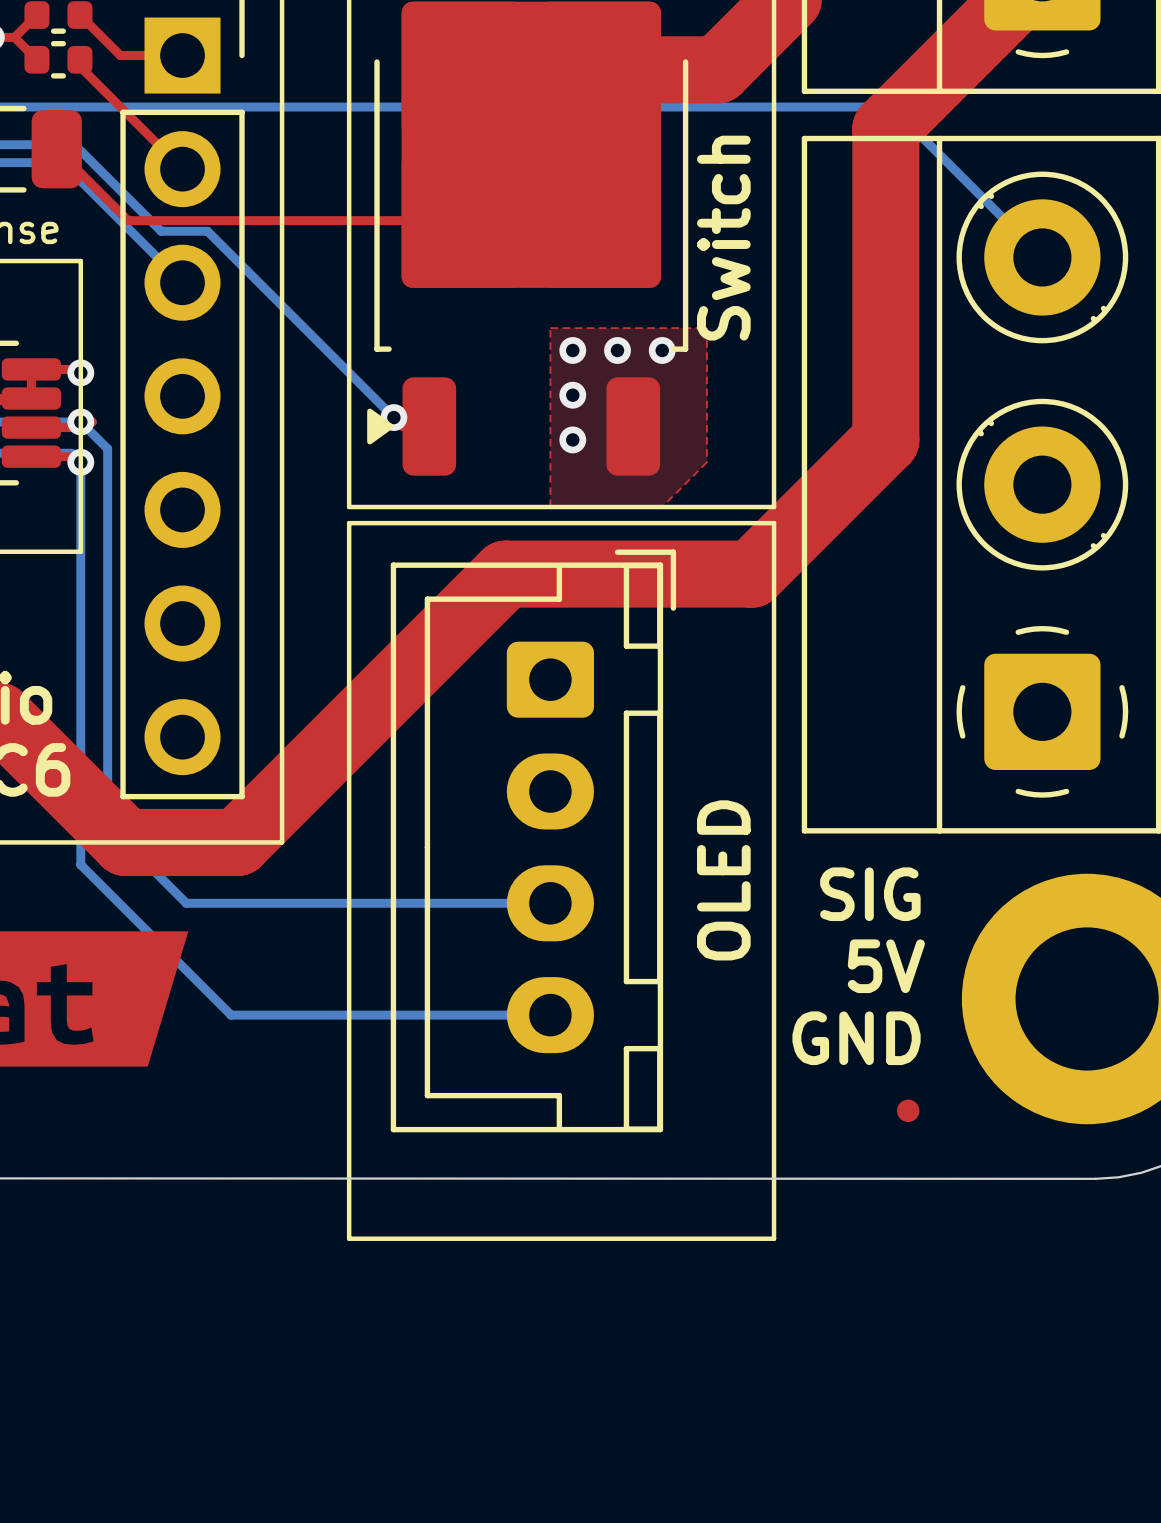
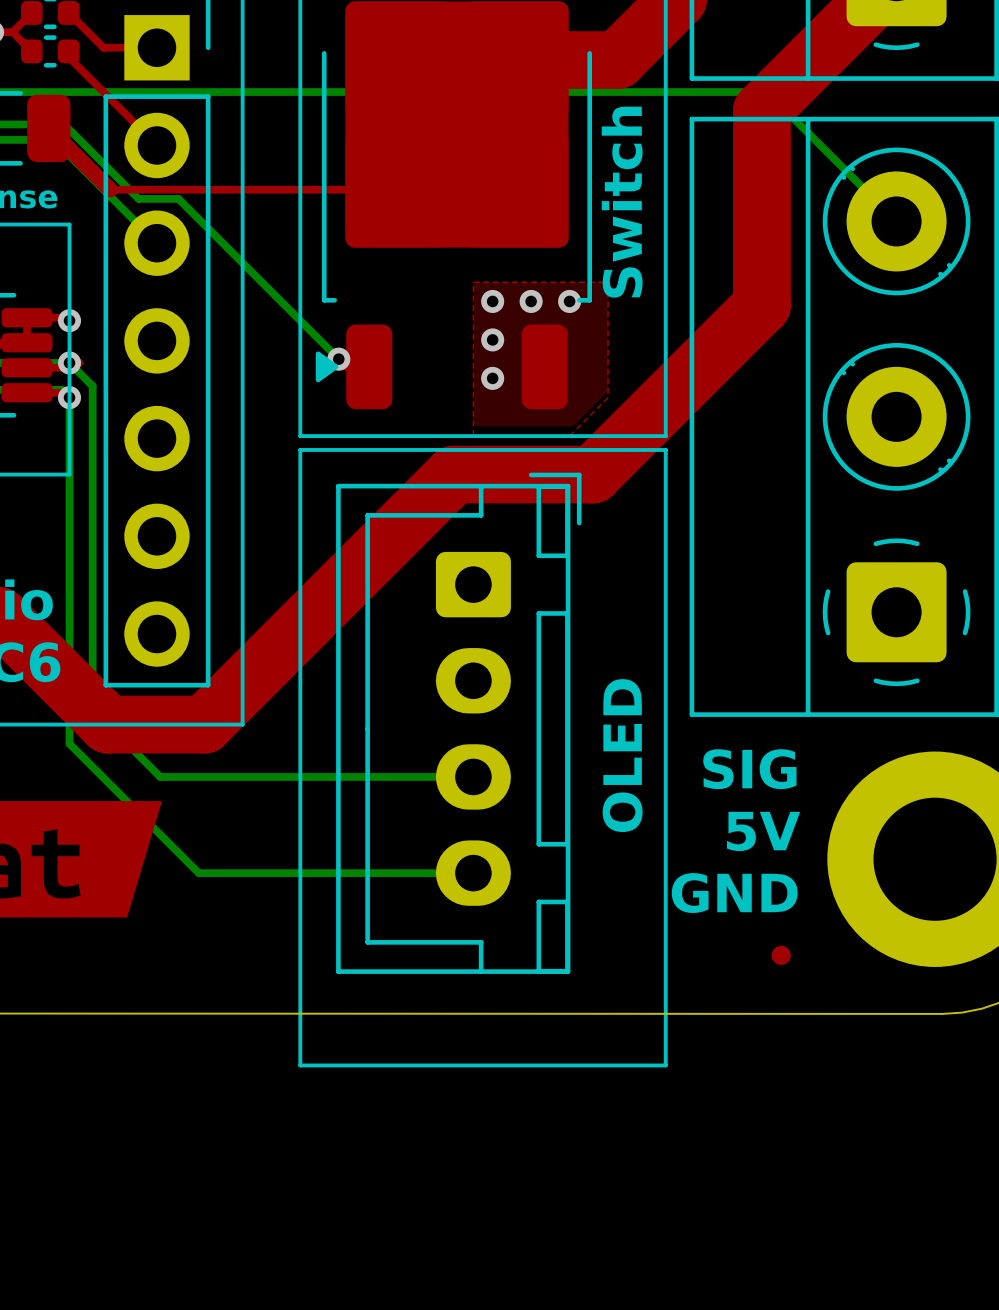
top track width: thin (56, 149) (128, 220) -> thick (48, 128) (110, 189)
top track: (885, 355) (885, 439) (751, 574) (505, 574) -> (761, 305) (592, 474) (454, 474) (434, 493)

